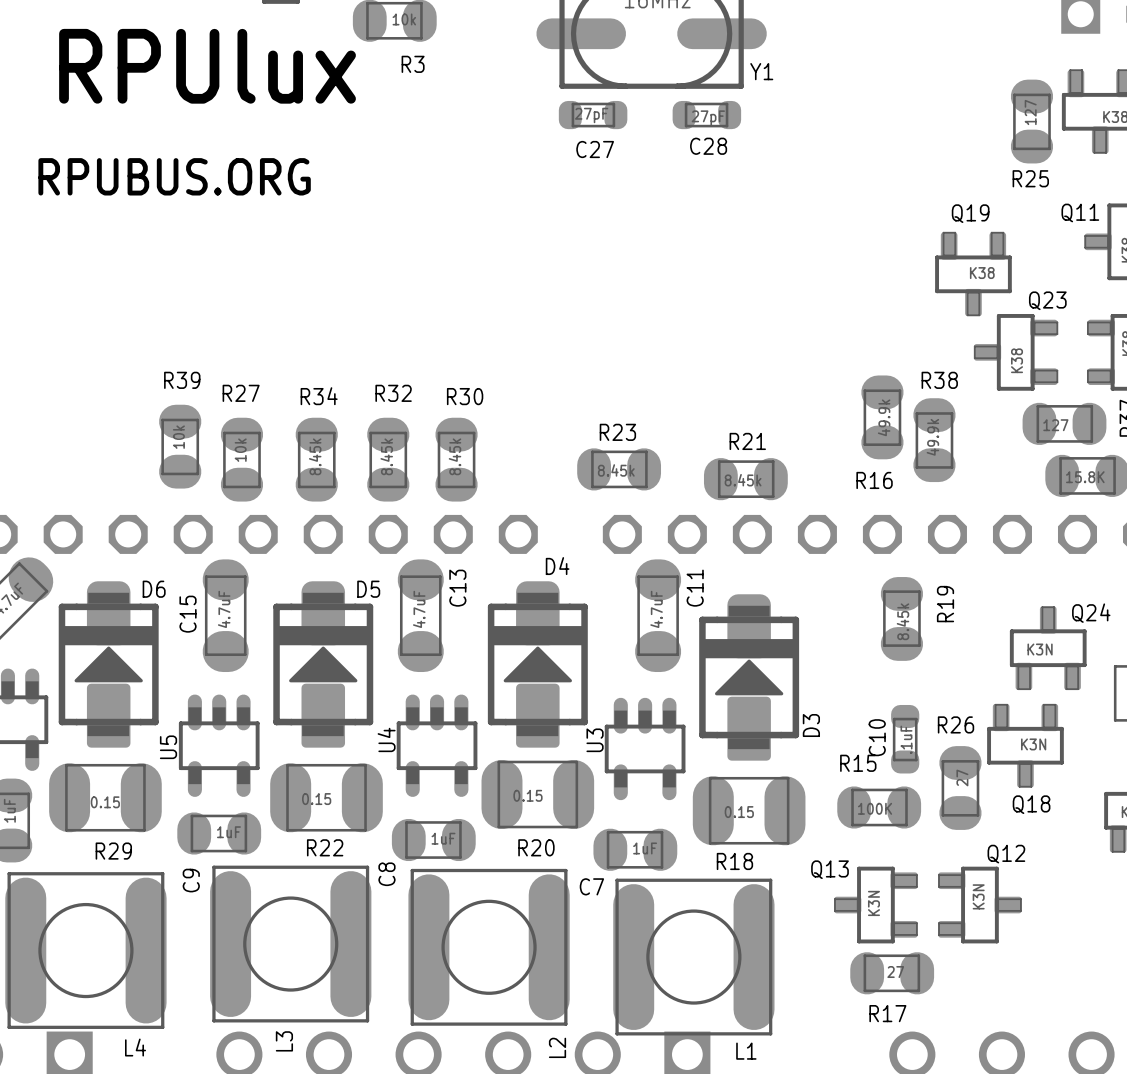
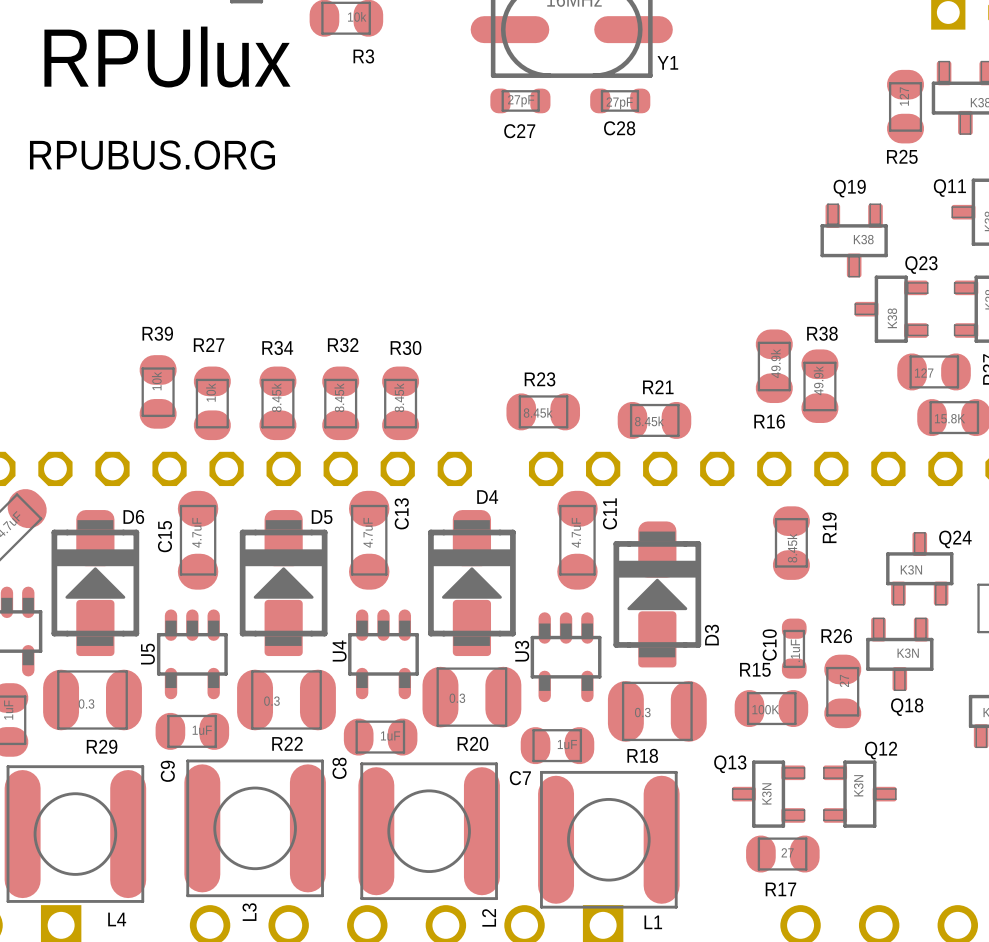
R20 value: 0.15 (527, 795) -> 0.3 (457, 698)
R22 value: 0.15 (316, 799) -> 0.3 (271, 701)
R29 value: 0.15 (105, 802) -> 0.3 (86, 703)
R18 value: 0.15 (739, 812) -> 0.3 (642, 712)

